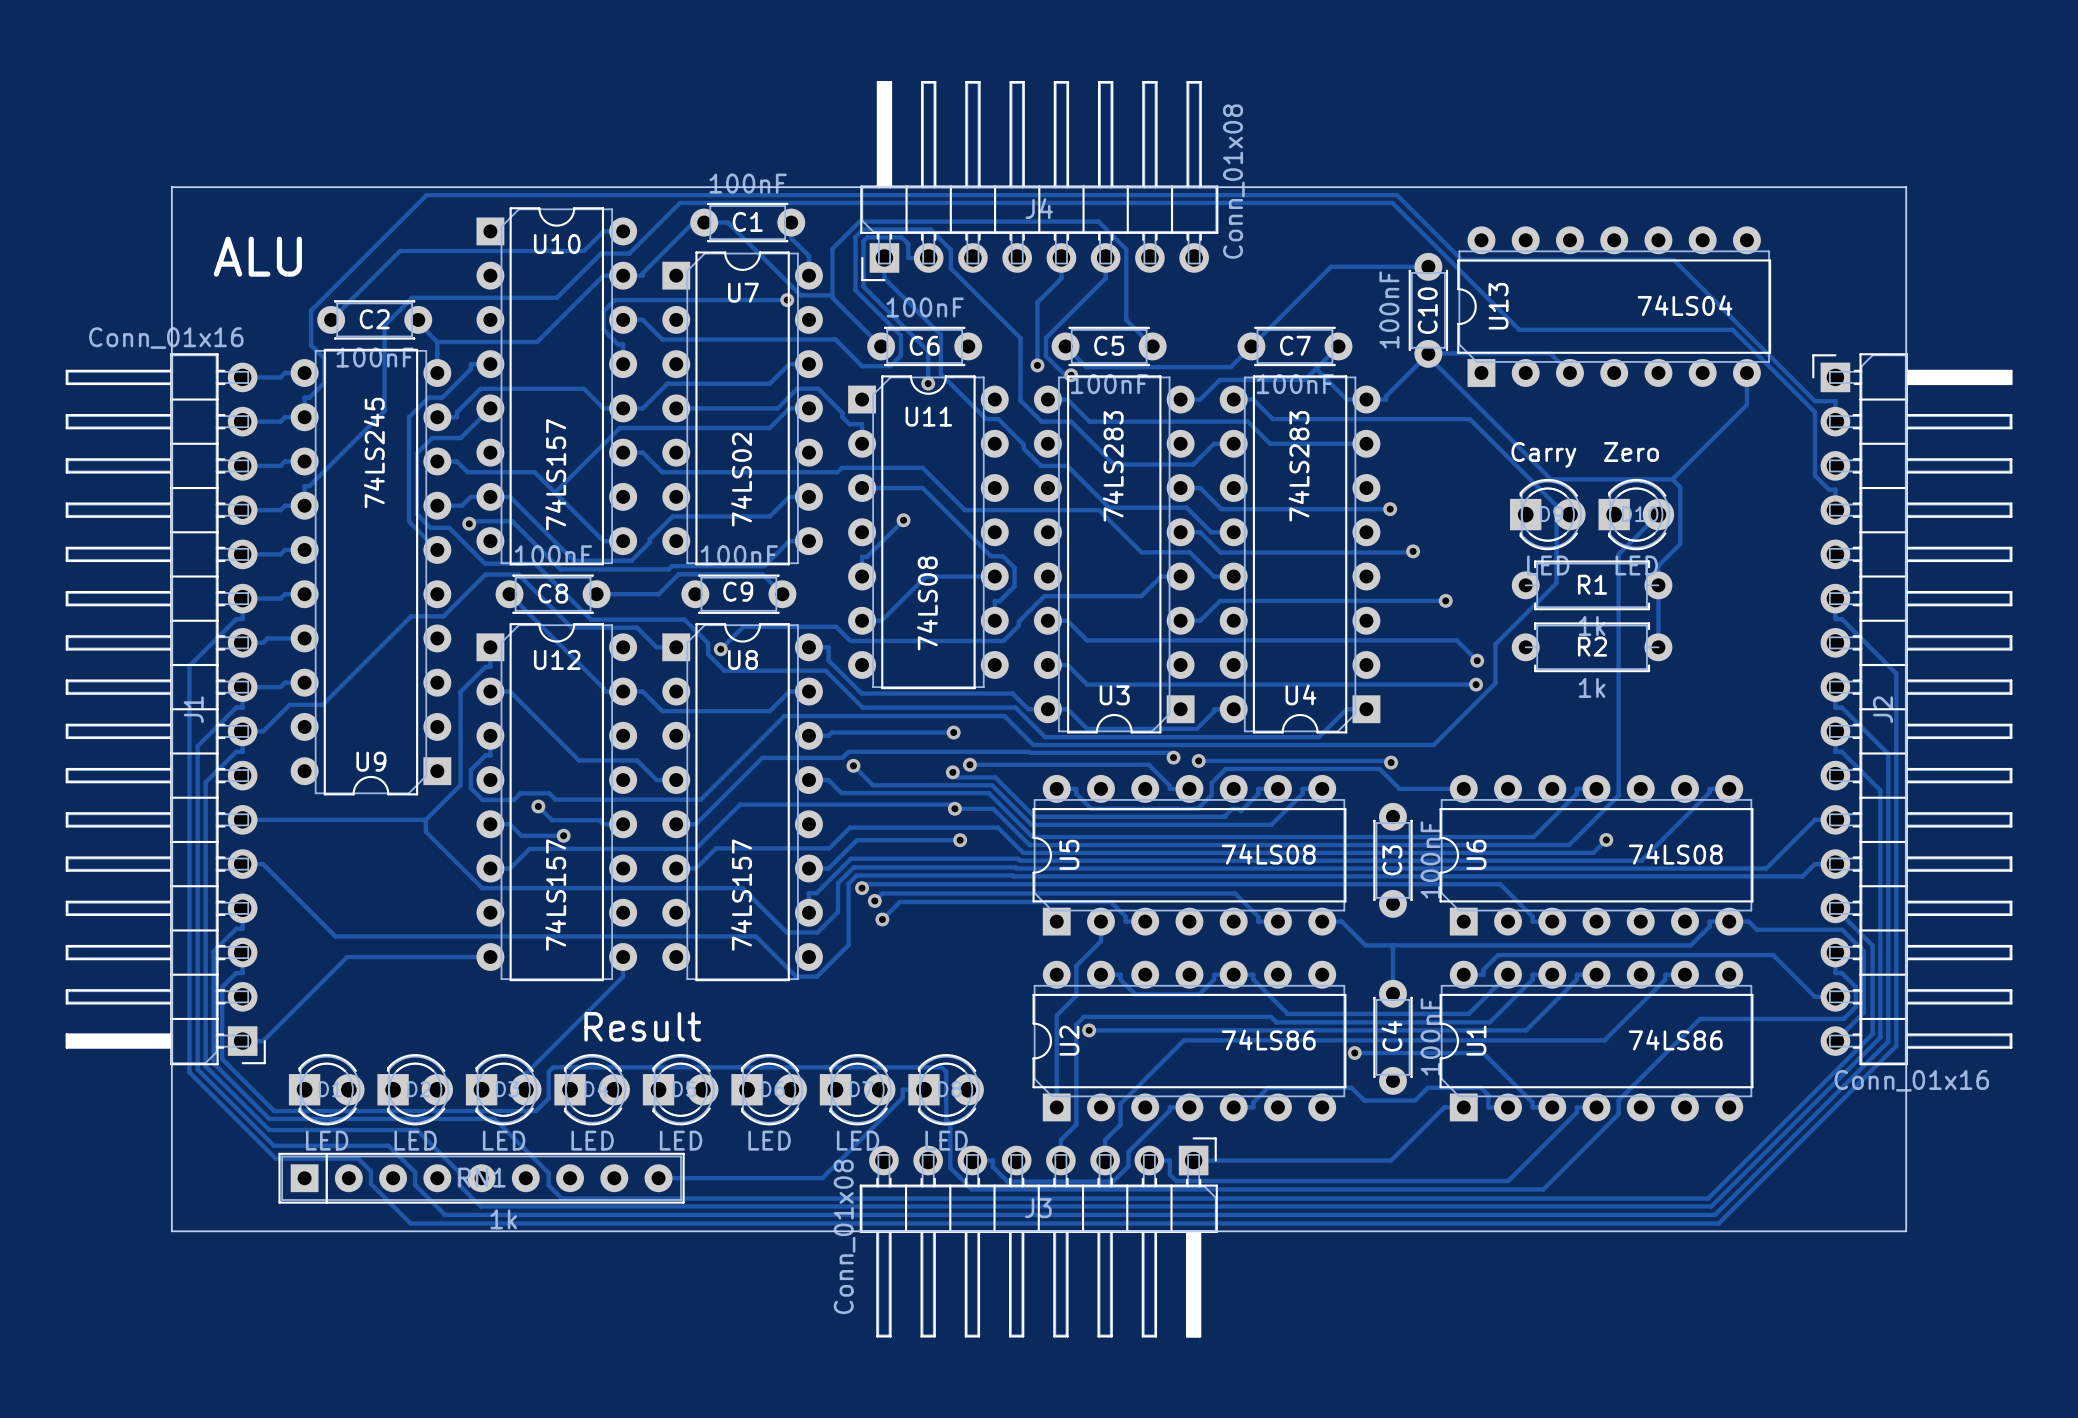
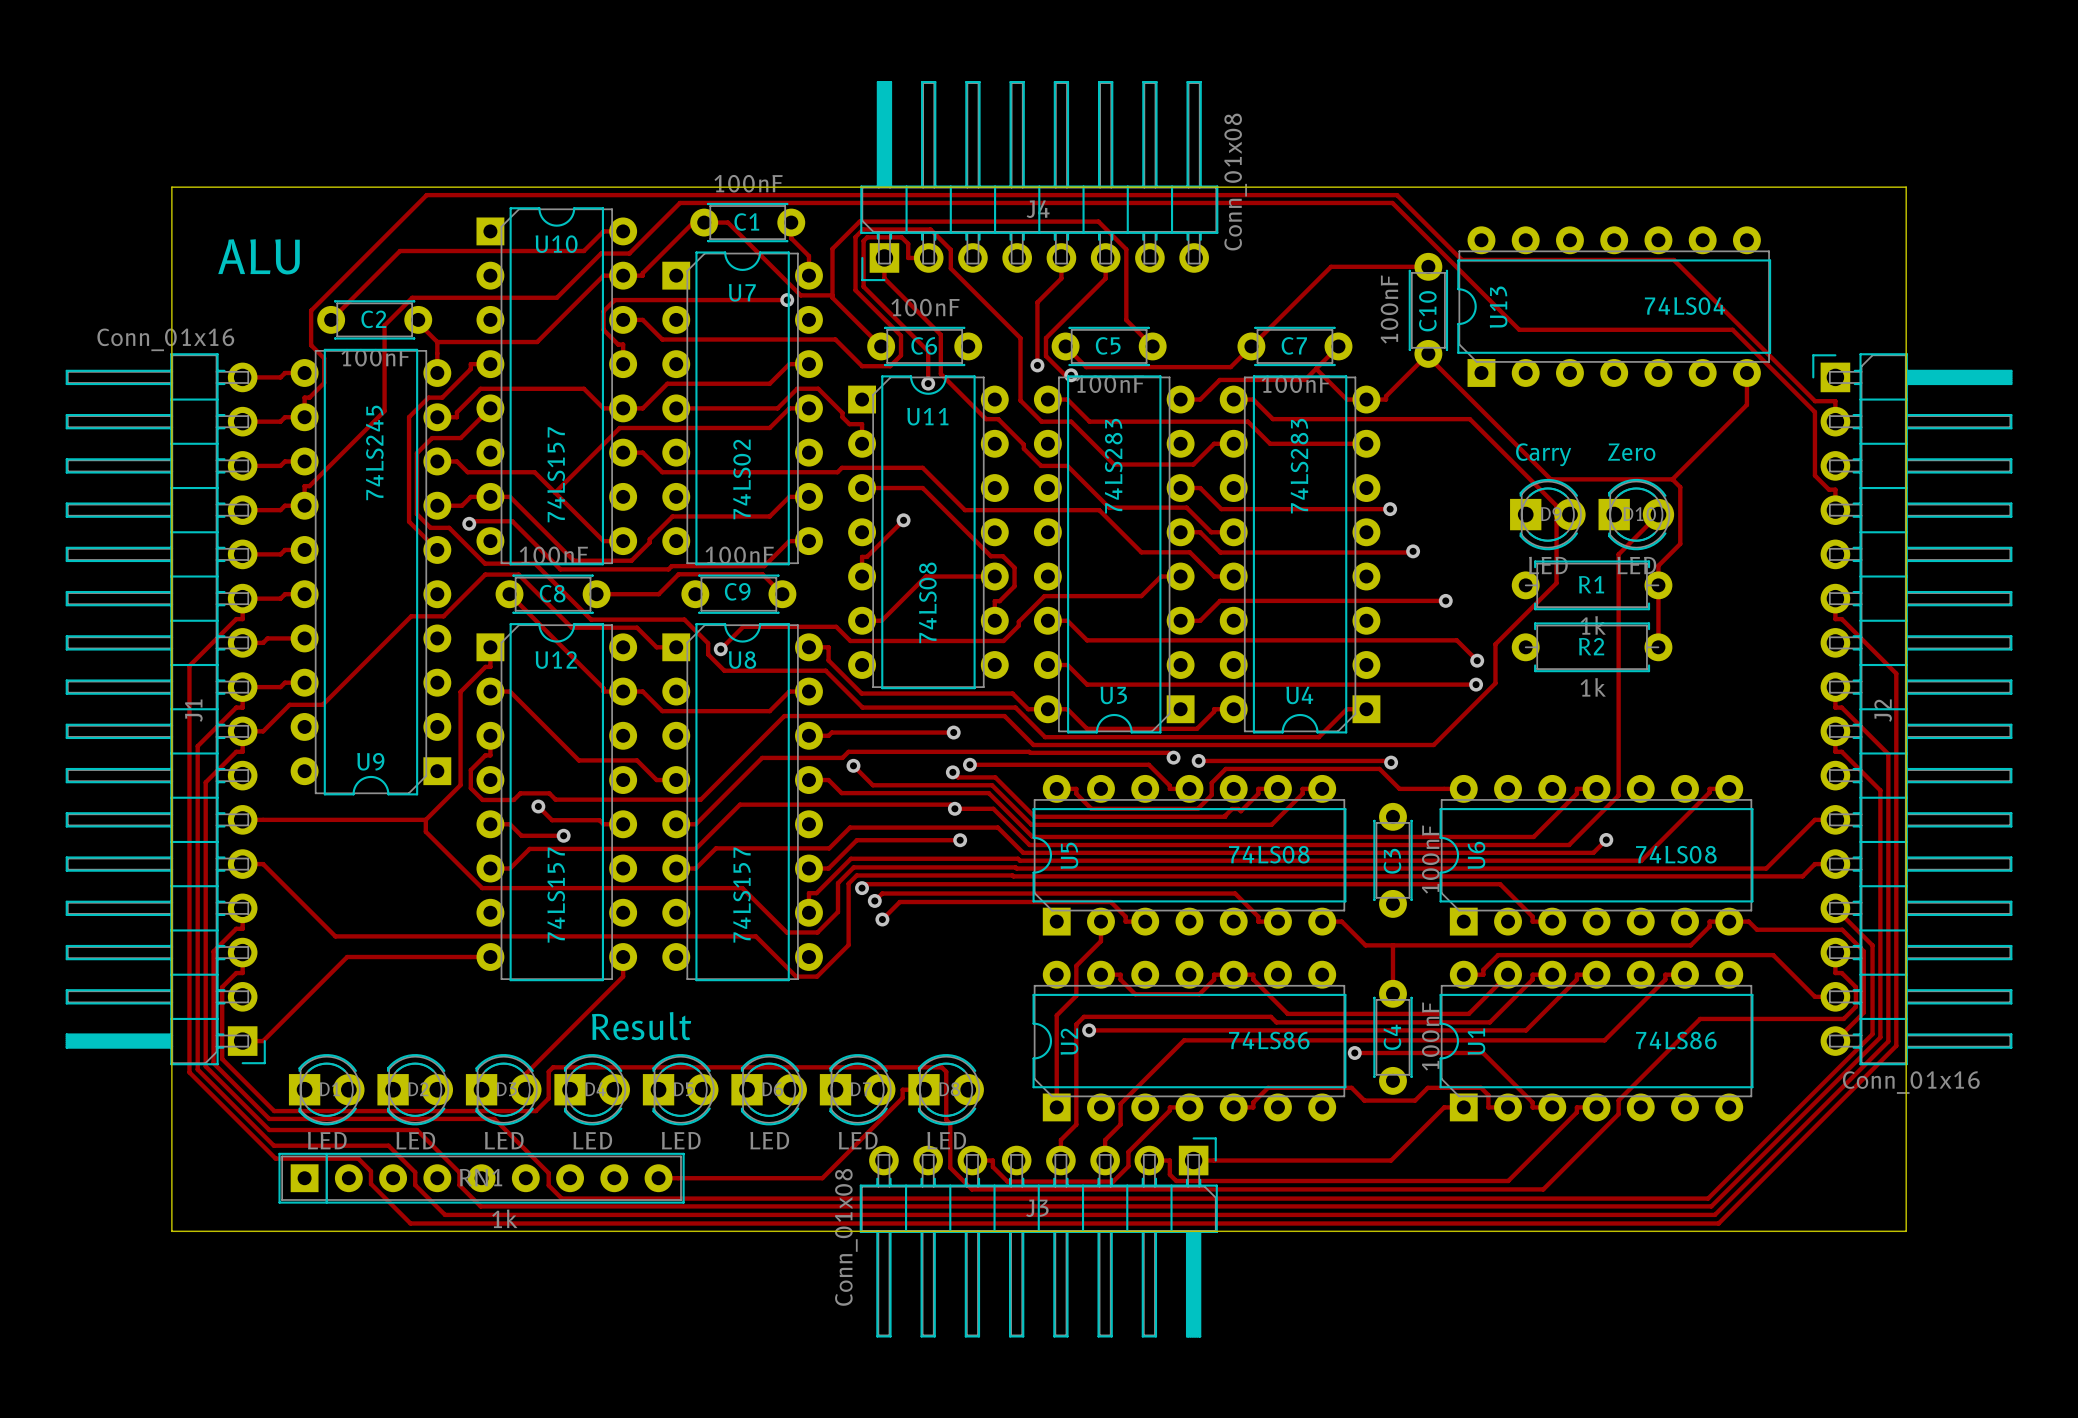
track: (1428, 353) (1550, 353) (1569, 372) -> none

